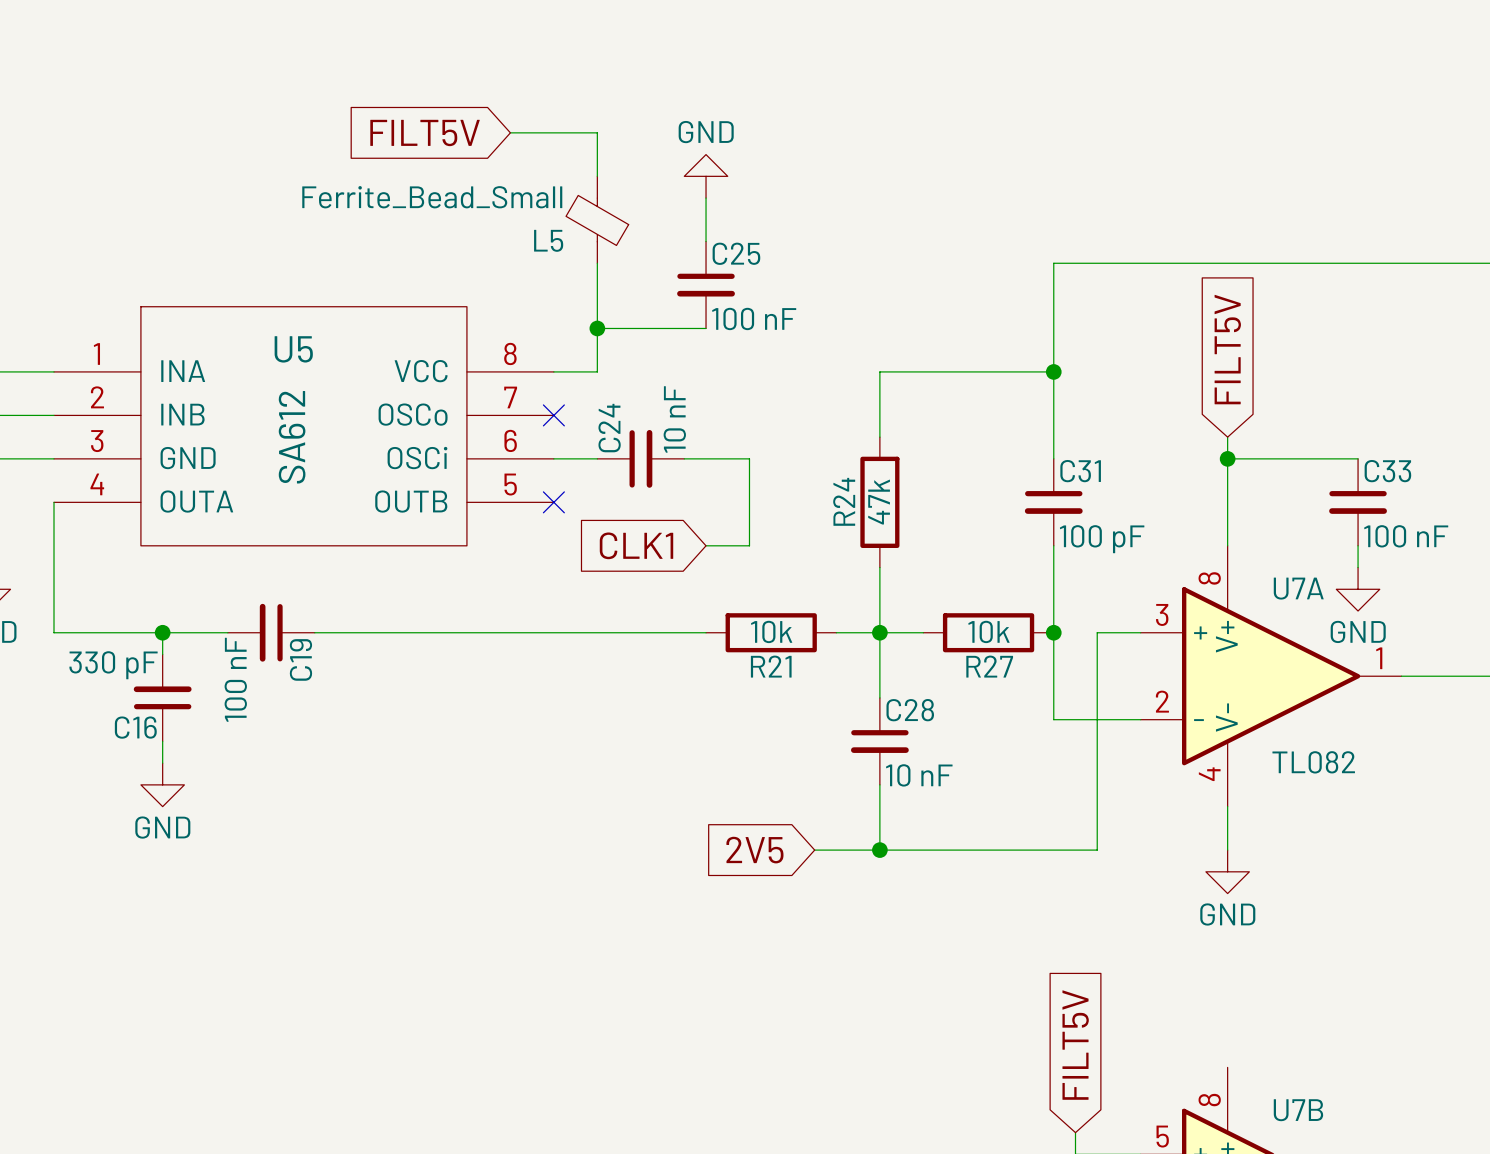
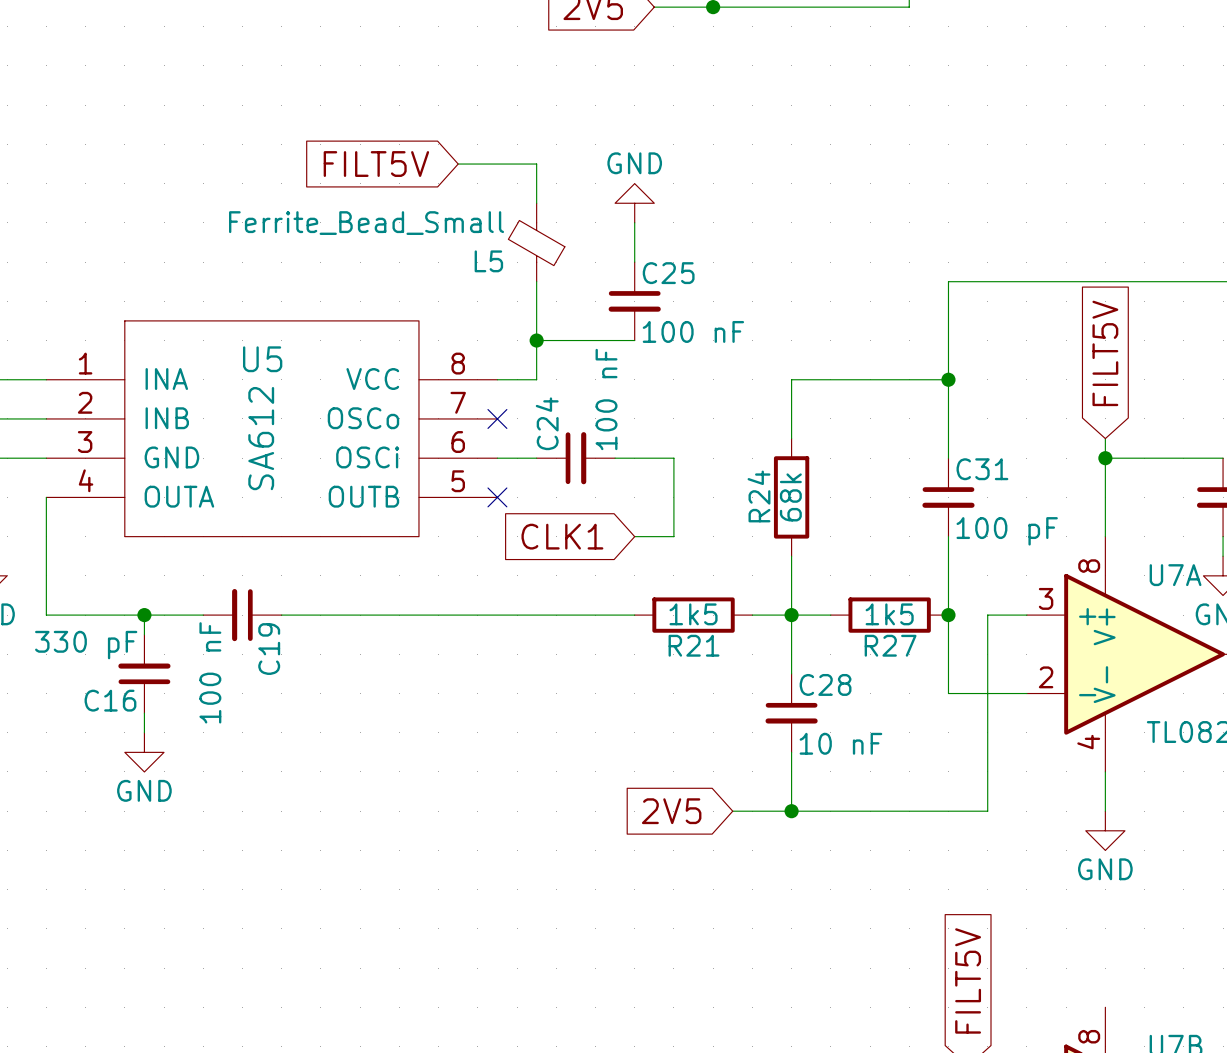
C24 value: 10 nF (674, 419) -> 100 nF (606, 399)
R24 value: 47k (879, 502) -> 68k (790, 497)
R21 value: 10k (771, 631) -> 1k5 (693, 614)
R27 value: 10k (988, 631) -> 1k5 (889, 614)

